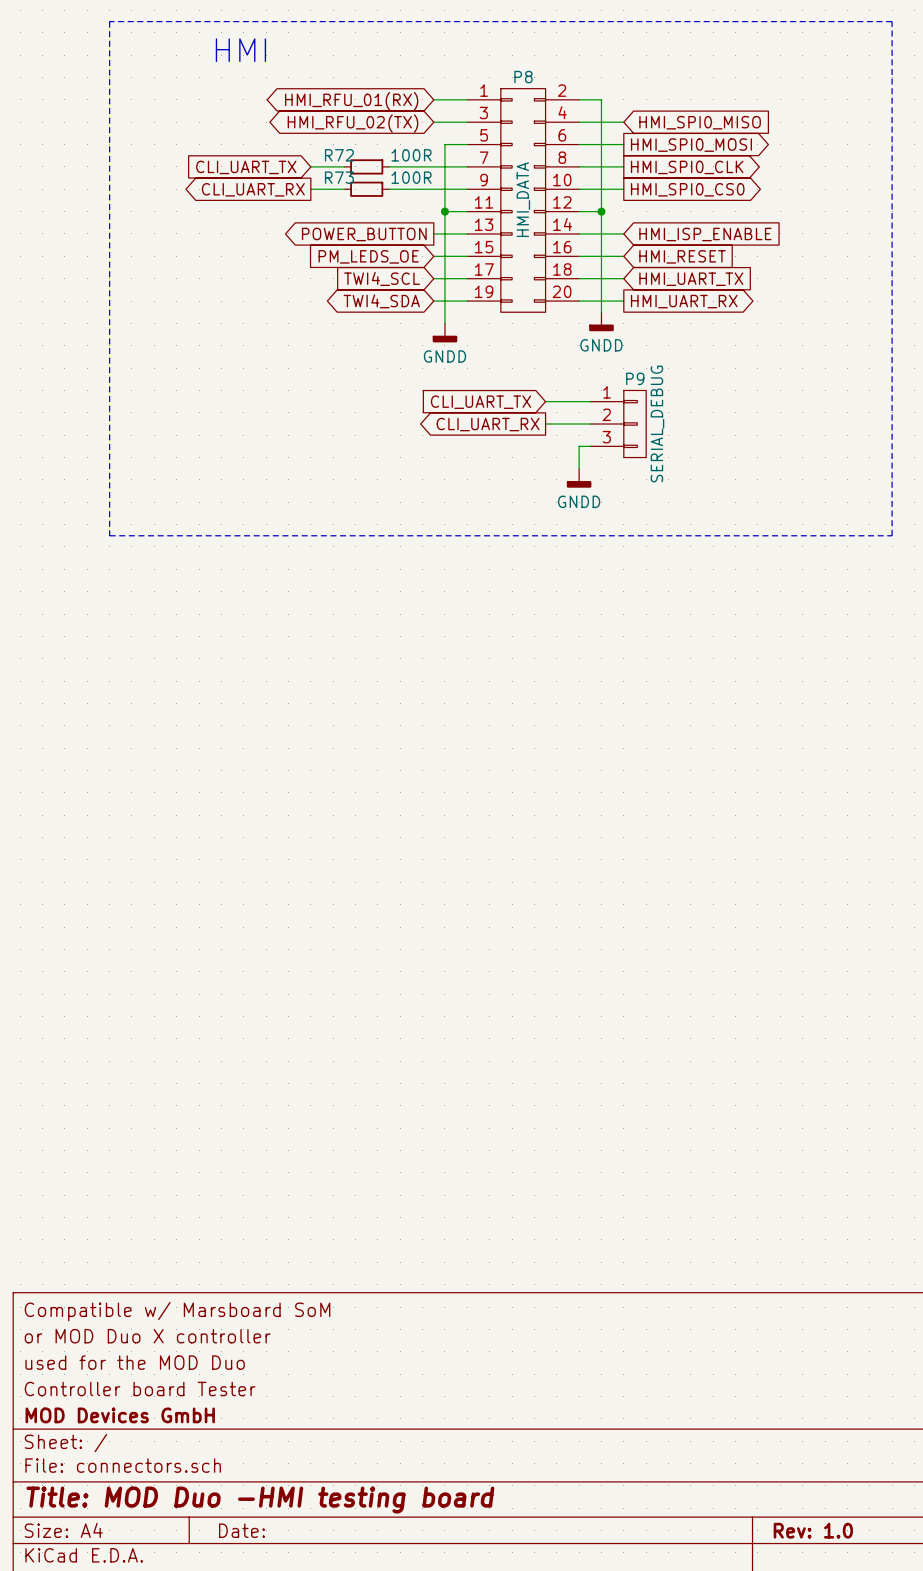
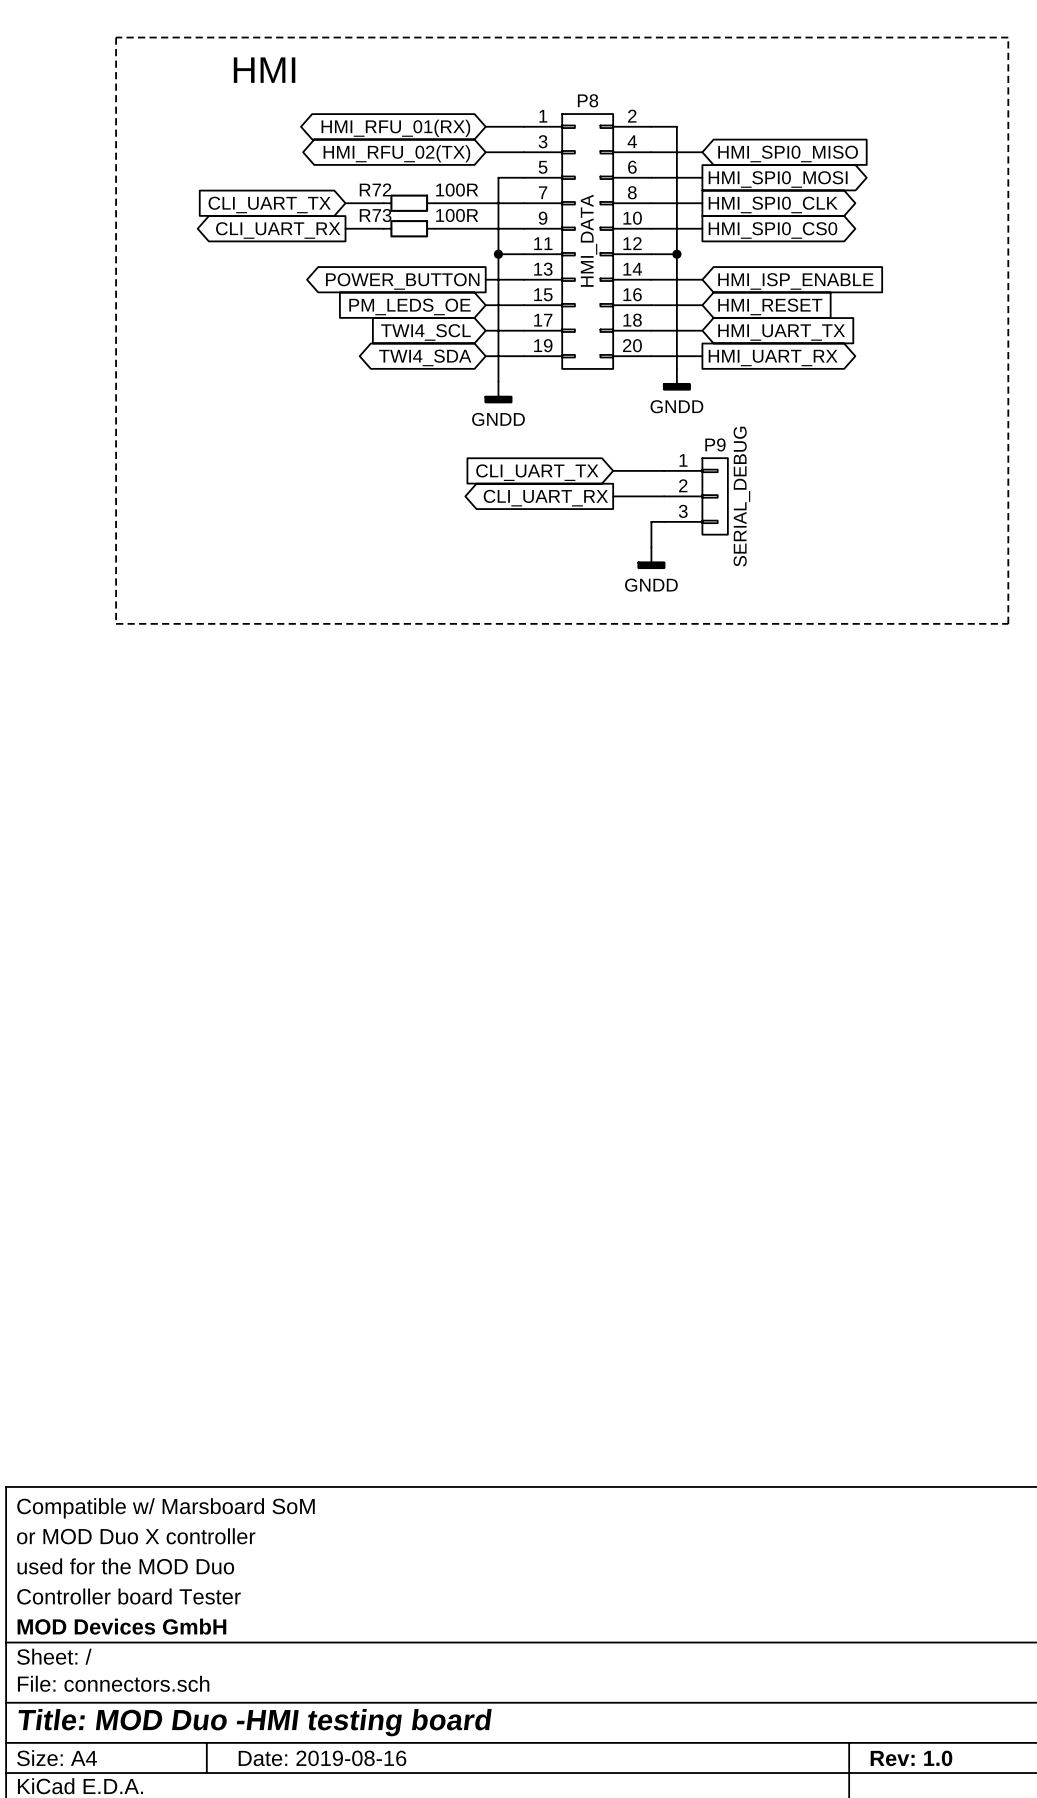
title block: Date: (241, 1530) -> Date: 2019-08-16 (322, 1758)

